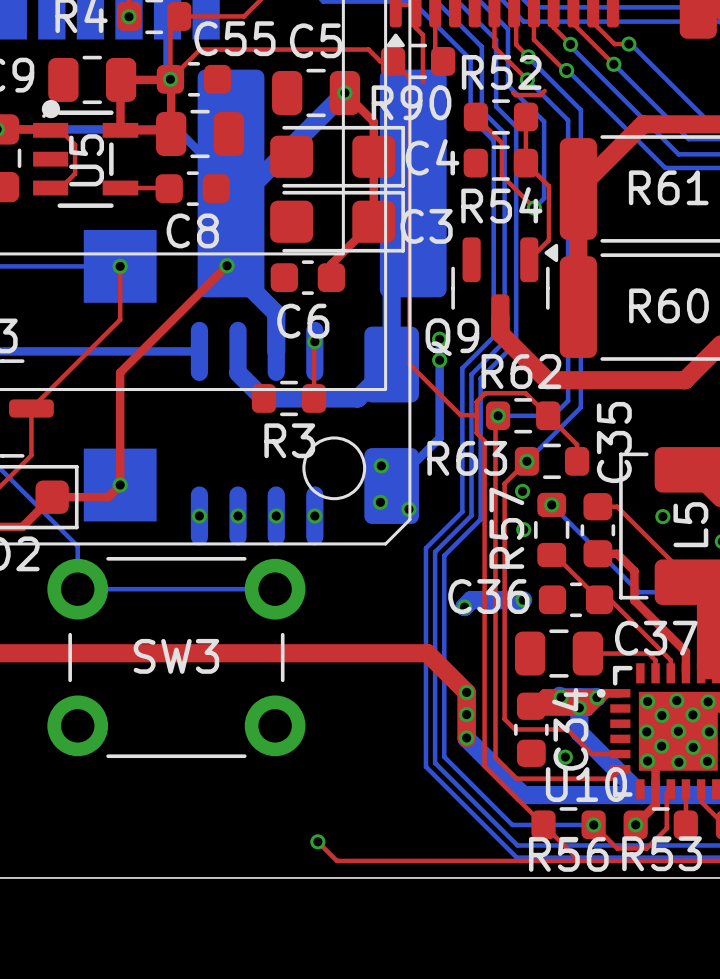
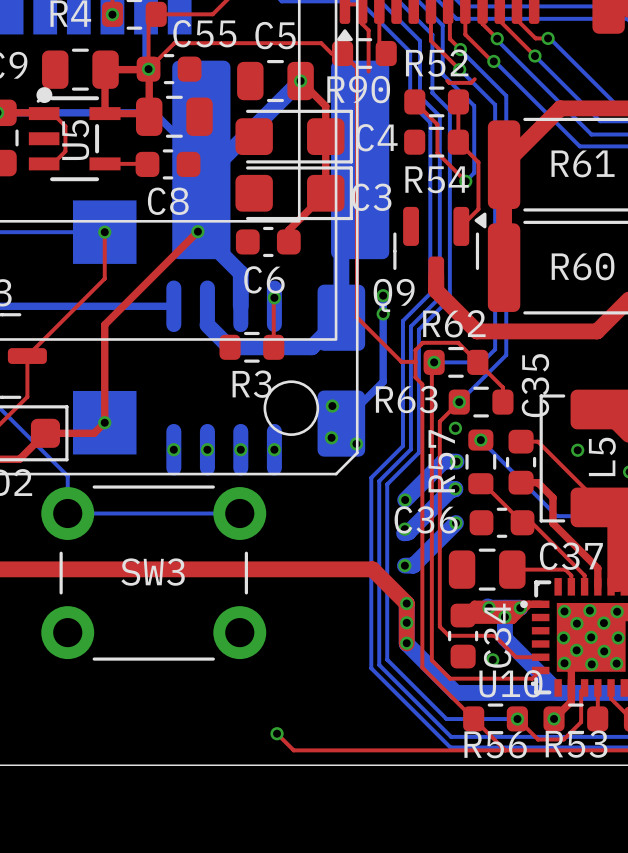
bottom track: none -> (456, 461) (443, 461) (405, 500)
bottom track: none -> (455, 488) (451, 489) (408, 532) (404, 533)
via: none -> (455, 488)
via: none -> (405, 500)
bottom track: (523, 600) (471, 600) (464, 606) -> (455, 523) (413, 565) (404, 565)
via: none -> (404, 565)

